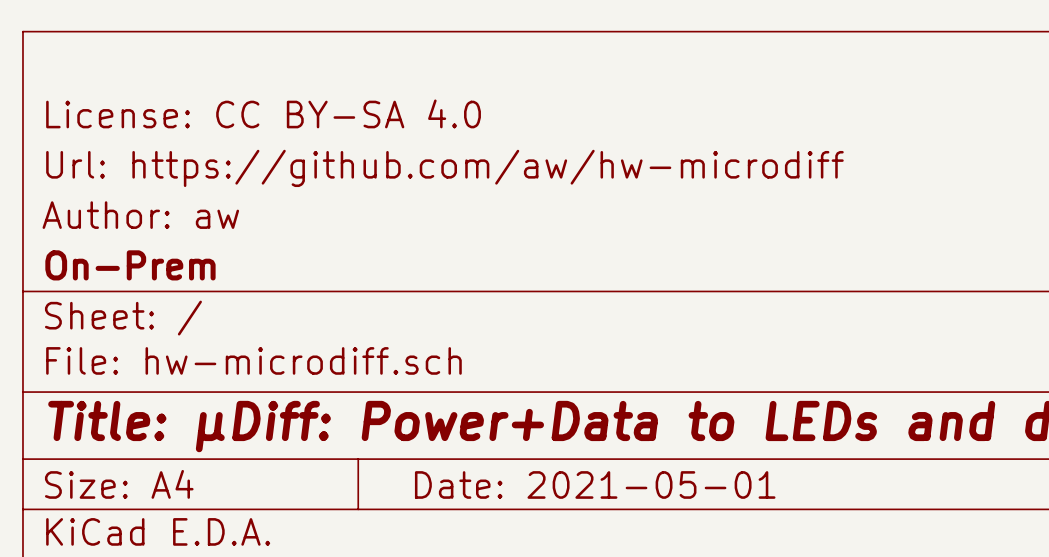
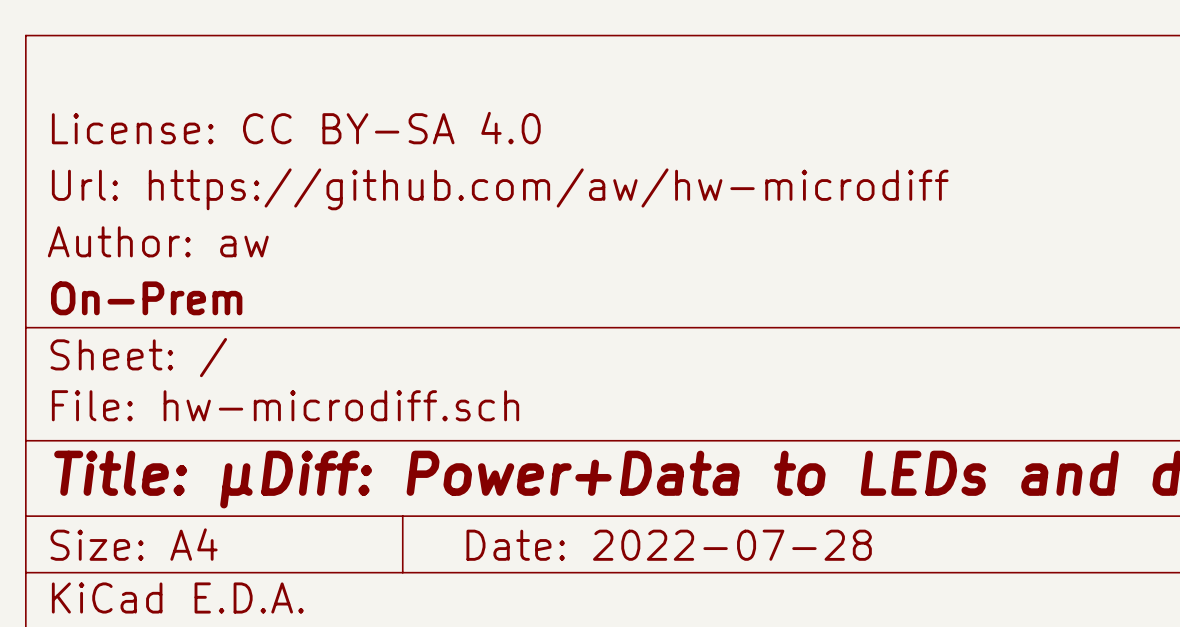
title block: Date: 2021-05-01 (595, 484) -> Date: 2022-07-28 (669, 545)

